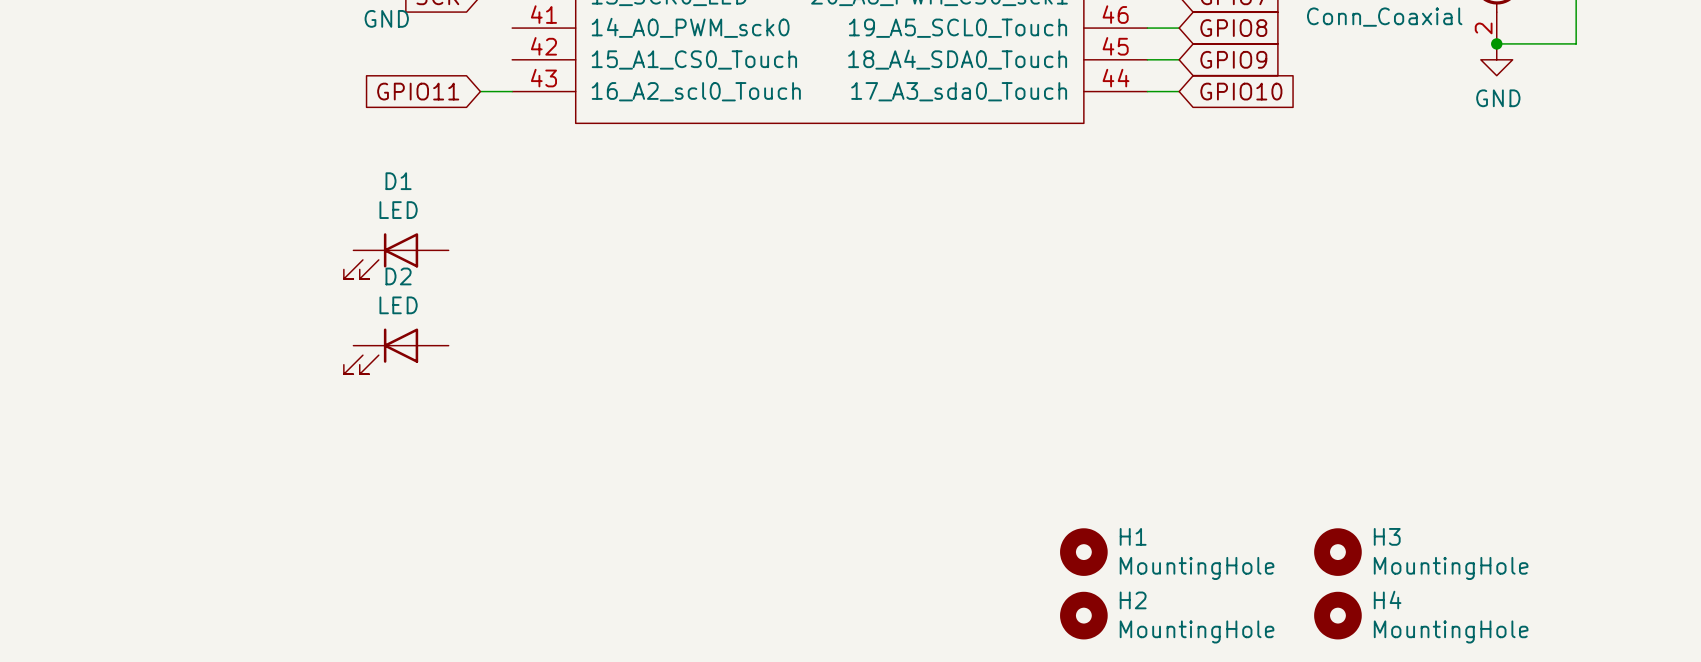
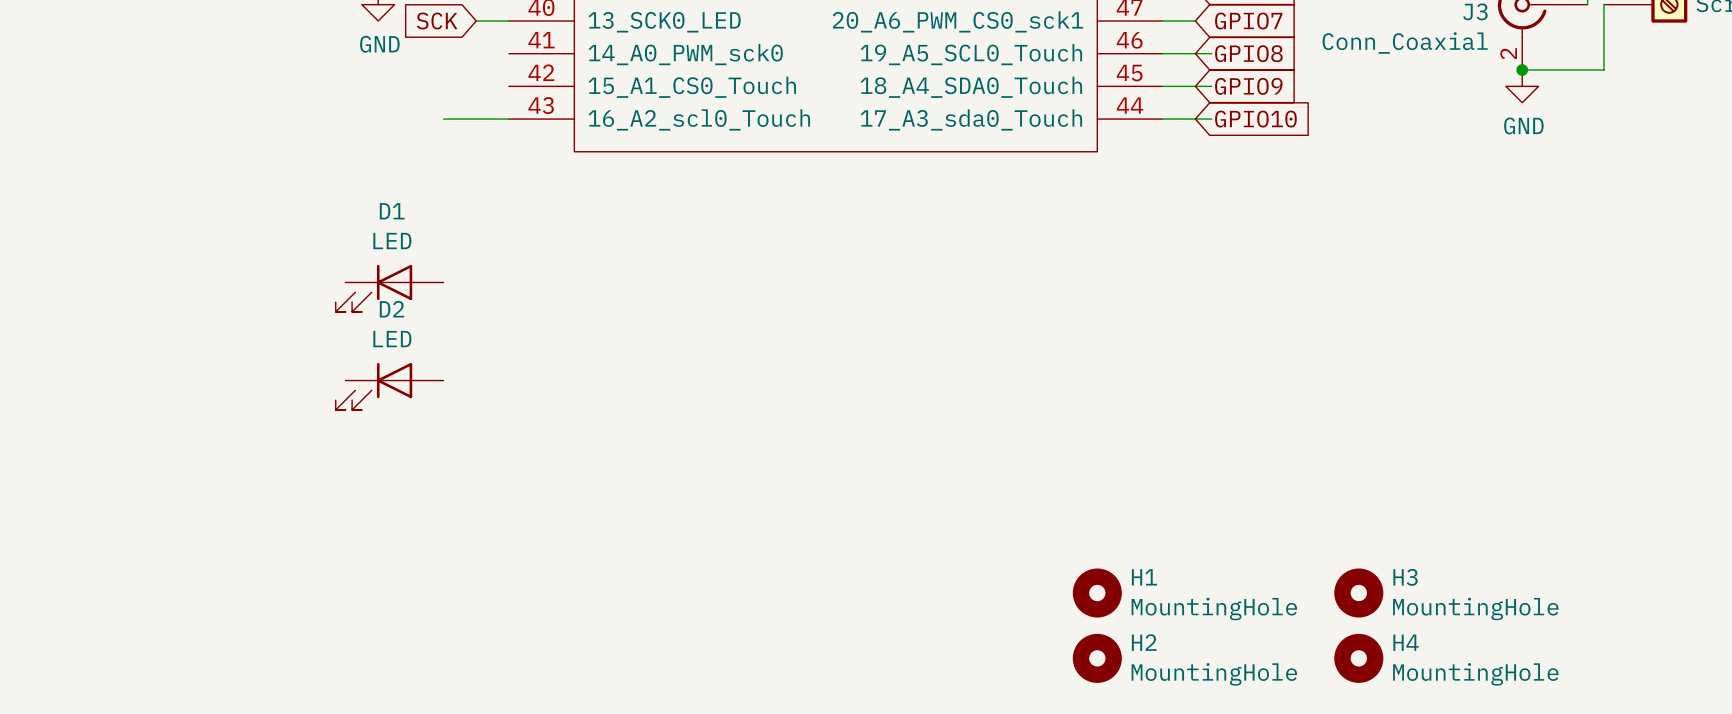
wire: none -> (1195, 53) (1211, 53)
wire: none -> (1195, 86) (1211, 86)
global label: GPIO11 (418, 91) -> none
wire: none -> (443, 119) (476, 119)
wire: none -> (1195, 119) (1211, 119)

